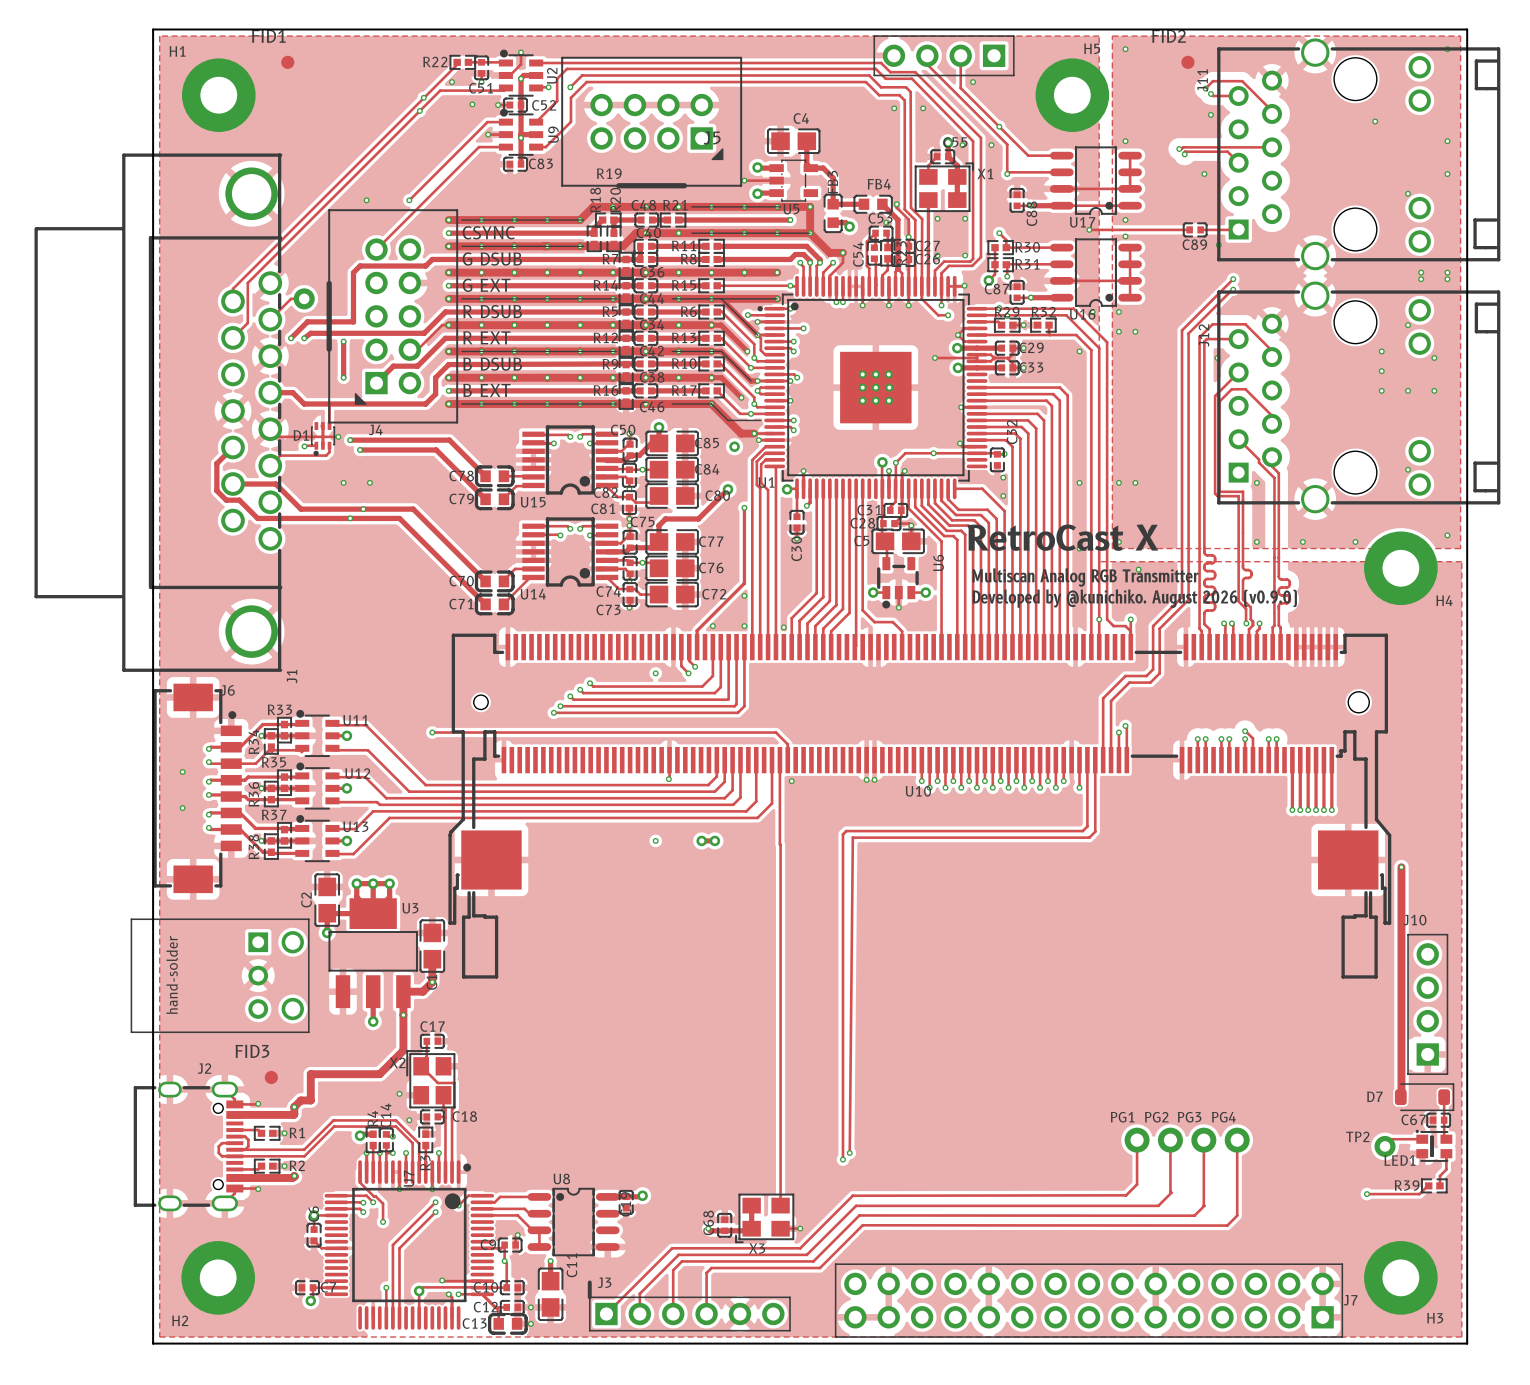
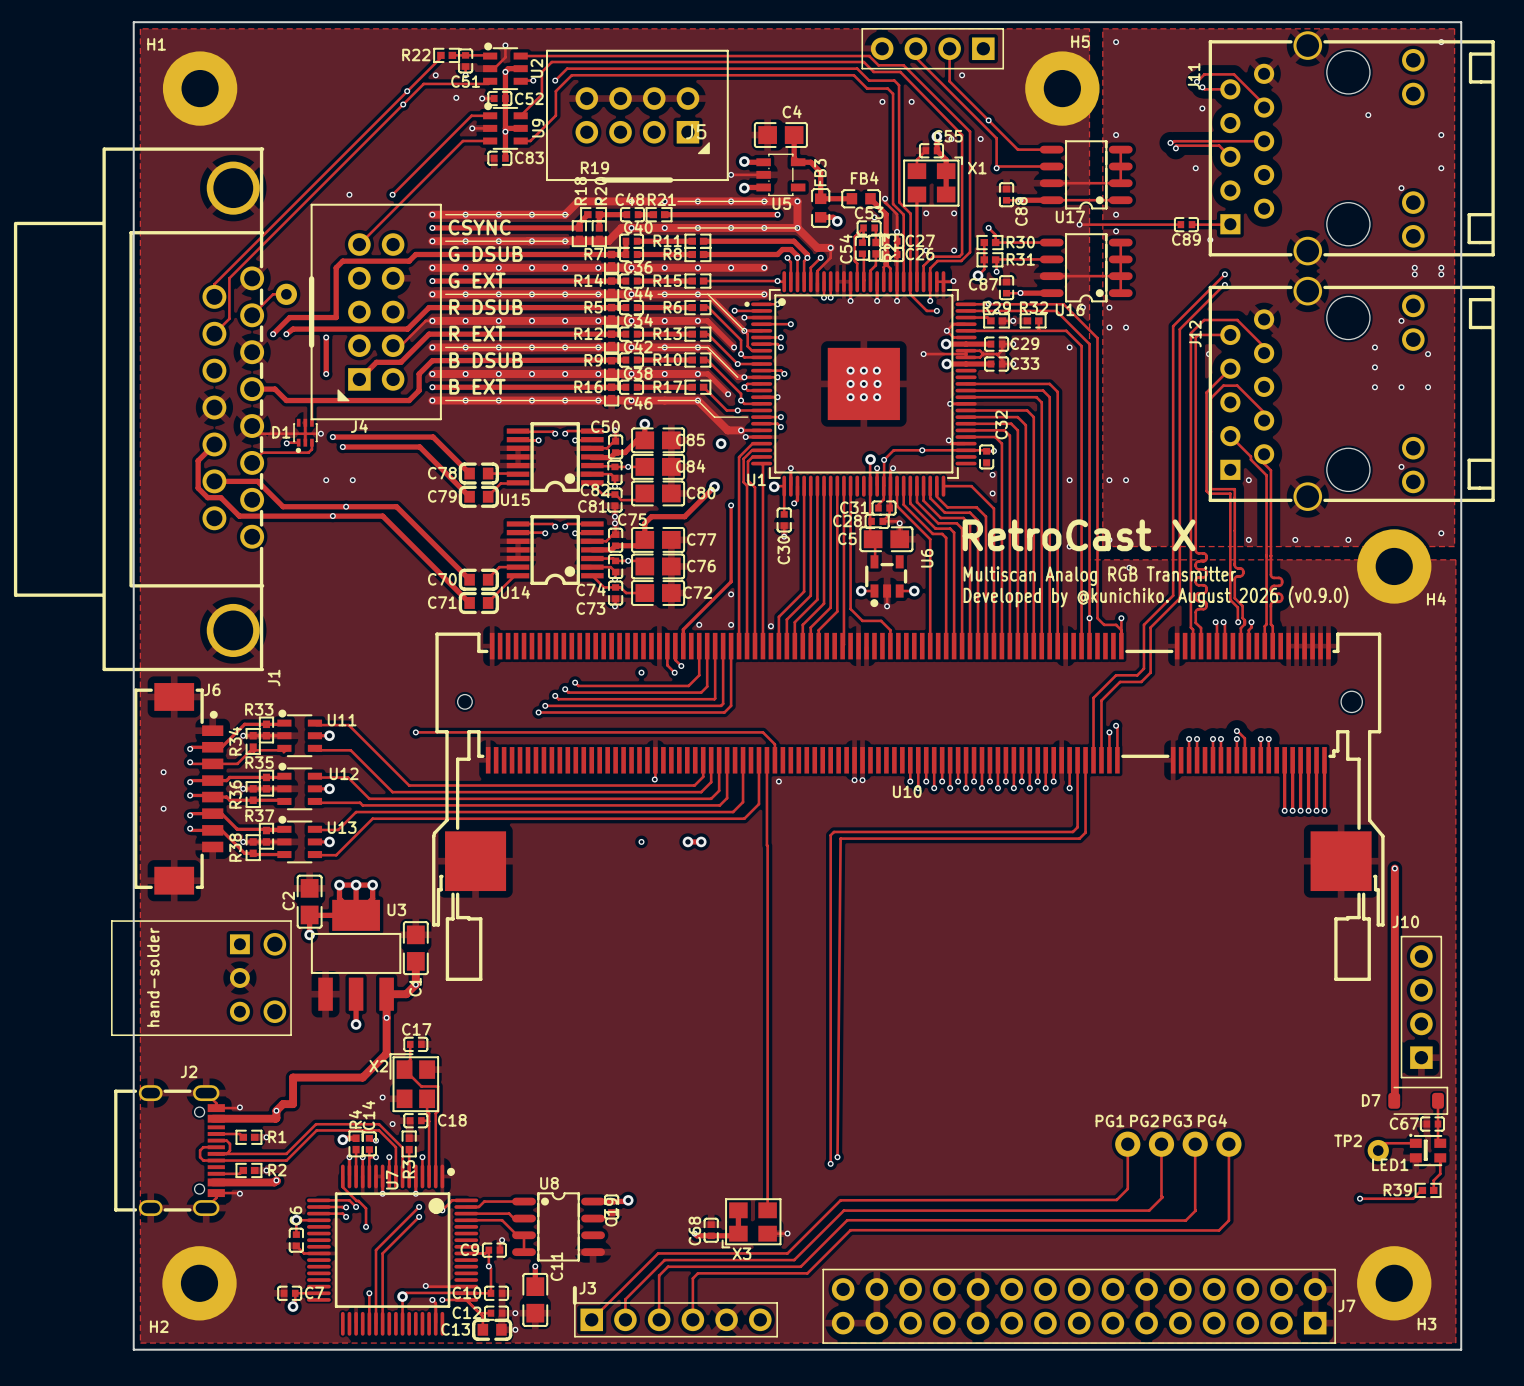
FID1: (287, 62) -> none
FID2: (1187, 62) -> none
FID3: (271, 1077) -> none

